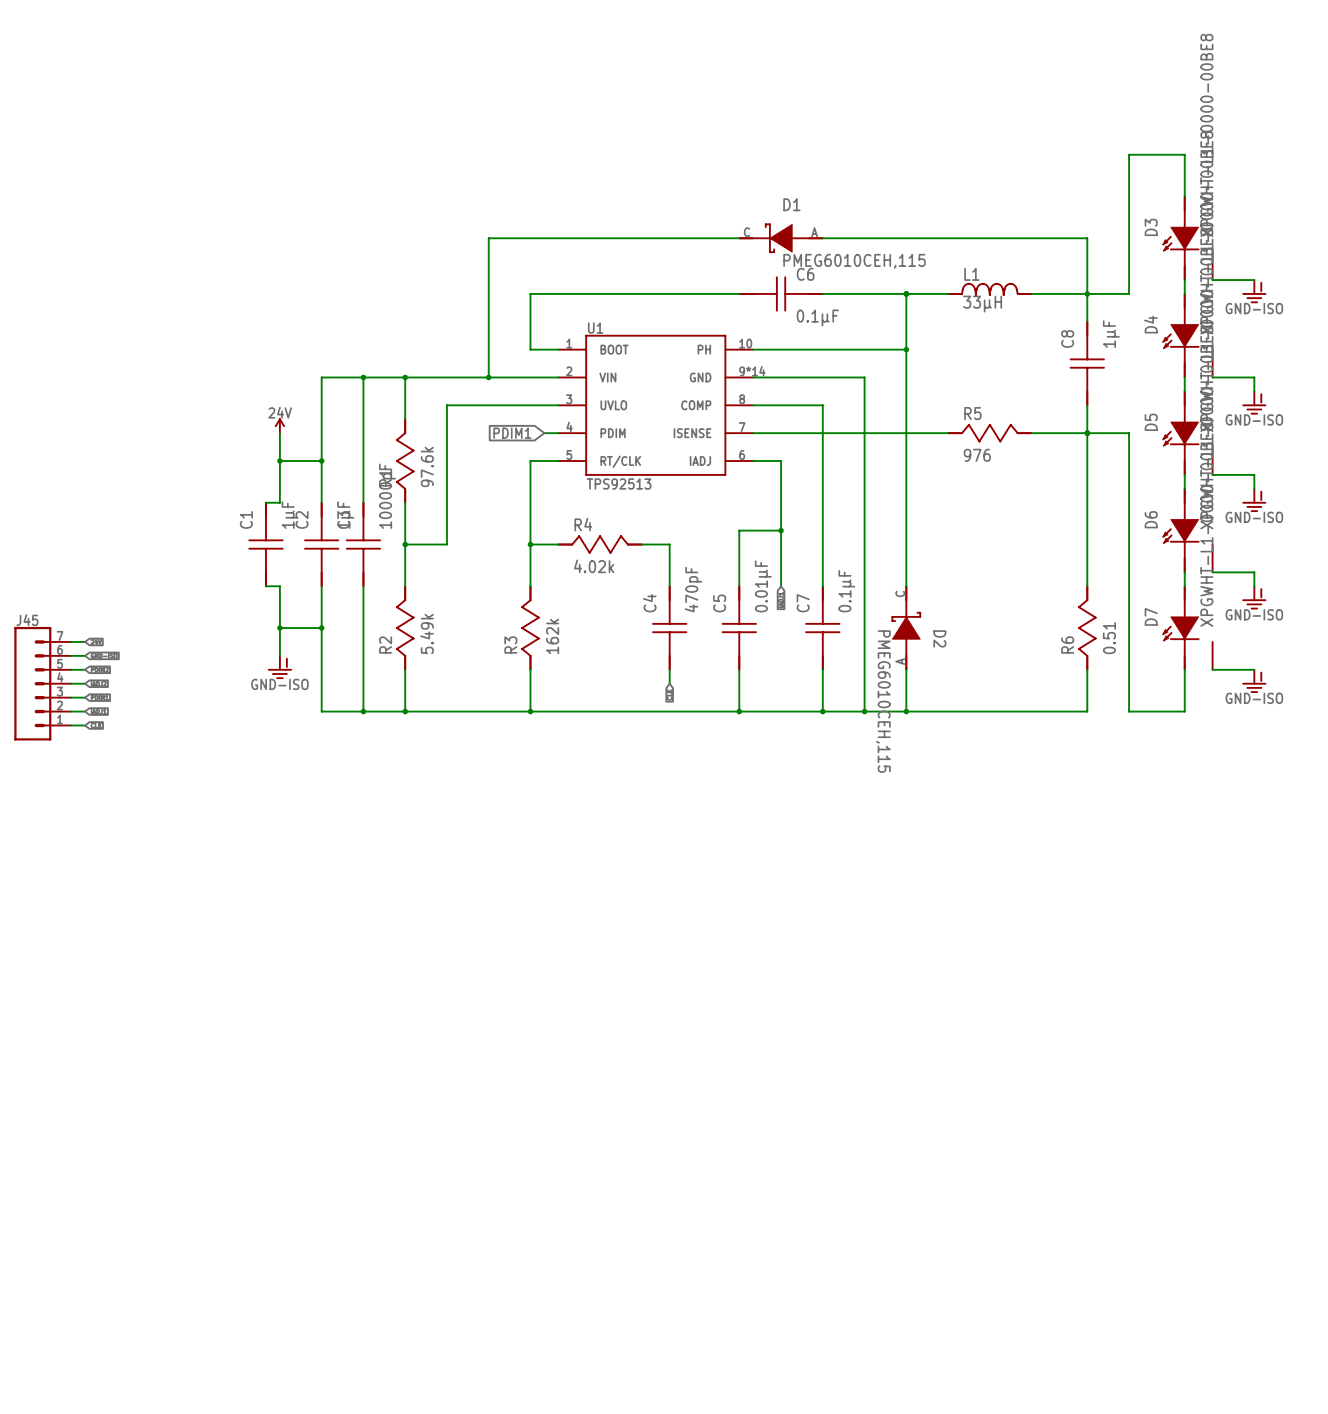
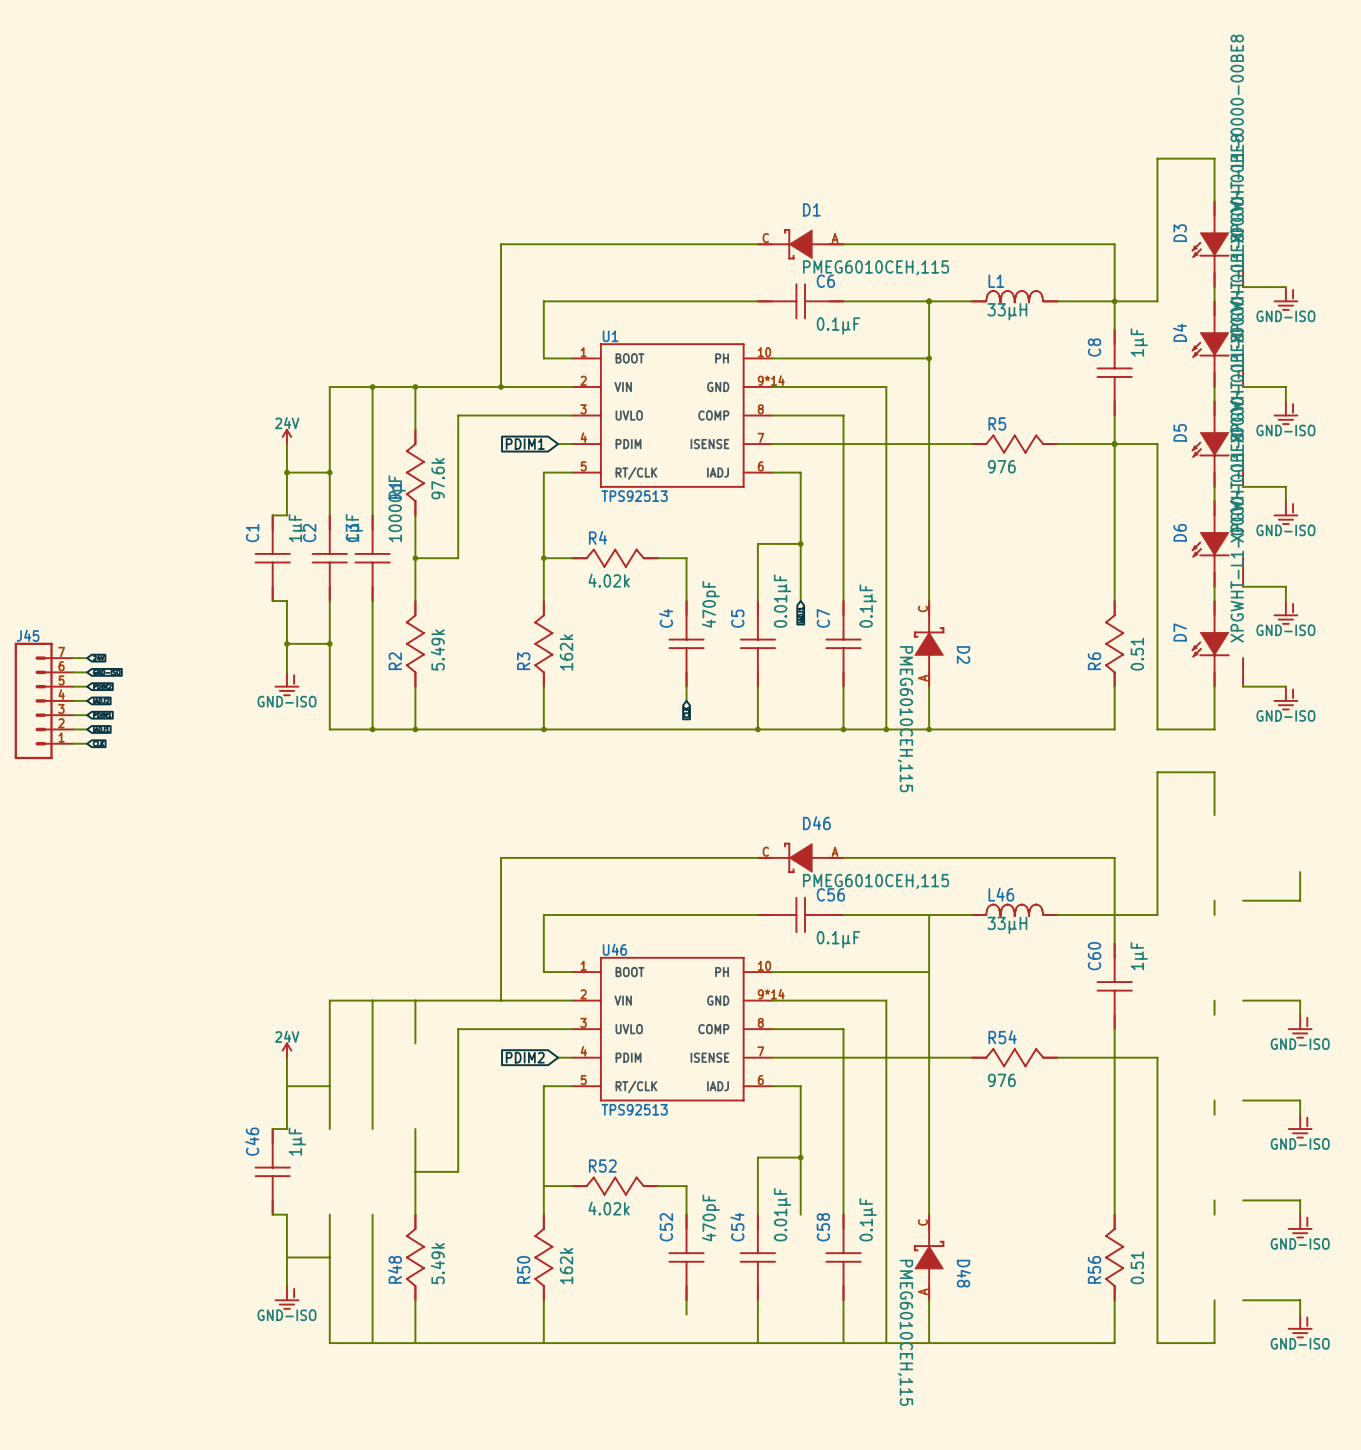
wire: none -> (1214, 815) (1214, 772) (1157, 772) (1157, 914) (1057, 914)
wire: none -> (757, 857) (501, 857) (501, 1000)
D46: none -> PMEG6010CEH,115 (800, 857)
wire: none -> (843, 857) (1114, 857) (1114, 943)
wire: none -> (1300, 872) (1300, 900) (1243, 900)
wire: none -> (1214, 900) (1214, 914)
L46: none -> 33µH (1014, 910)
wire: none -> (757, 914) (543, 914) (543, 972) (572, 972)
C56: none -> 0.1µF (800, 914)
wire: none -> (843, 914) (971, 914)
wire: none -> (929, 914) (929, 1214)
wire: none -> (772, 972) (929, 972)
C60: none -> 1µF (1114, 986)
wire: none -> (372, 1000) (372, 1129)
wire: none -> (415, 1000) (415, 1043)
wire: none -> (572, 1000) (329, 1000) (329, 1129)
wire: none -> (772, 1000) (886, 1000) (886, 1343)
wire: none -> (1214, 1000) (1214, 1014)
wire: none -> (1243, 1000) (1300, 1000) (1300, 1014)
power symbol: none -> GND-ISO (1300, 1026)
wire: none -> (572, 1029) (458, 1029) (458, 1171) (415, 1171)
U46: none -> TPS92513 (672, 1029)
wire: none -> (772, 1029) (843, 1029) (843, 1214)
wire: none -> (1114, 1029) (1114, 1214)
power symbol: none -> 24V (286, 1050)
wire: none -> (286, 1057) (286, 1129) (272, 1129)
global label: none -> PDIM2 (525, 1057)
wire: none -> (558, 1057) (572, 1057)
wire: none -> (772, 1057) (971, 1057)
R54: none -> 976 (1014, 1057)
wire: none -> (1057, 1057) (1157, 1057) (1157, 1343) (1214, 1343) (1214, 1300)
wire: none -> (286, 1086) (329, 1086)
wire: none -> (572, 1086) (543, 1086) (543, 1214)
wire: none -> (772, 1086) (800, 1086) (800, 1214)
wire: none -> (1214, 1100) (1214, 1114)
wire: none -> (1243, 1100) (1300, 1100) (1300, 1114)
power symbol: none -> GND-ISO (1300, 1126)
wire: none -> (415, 1129) (415, 1214)
wire: none -> (800, 1157) (757, 1157) (757, 1214)
junction: none -> (800, 1157)
C46: none -> 1µF (272, 1171)
wire: none -> (543, 1186) (572, 1186)
R52: none -> 4.02k (615, 1186)
wire: none -> (657, 1186) (686, 1186) (686, 1214)
wire: none -> (1214, 1200) (1214, 1214)
wire: none -> (1243, 1200) (1300, 1200) (1300, 1214)
wire: none -> (272, 1214) (286, 1214) (286, 1286)
wire: none -> (329, 1214) (329, 1343) (1114, 1343) (1114, 1300)
wire: none -> (372, 1214) (372, 1343)
power symbol: none -> GND-ISO (1300, 1226)
wire: none -> (286, 1257) (329, 1257)
R48: none -> 5.49k (415, 1257)
R50: none -> 162k (543, 1257)
C52: none -> 470pF (686, 1257)
C54: none -> 0.01μF (757, 1257)
C58: none -> 0.1µF (843, 1257)
D48: none -> PMEG6010CEH,115 (929, 1257)
R56: none -> 0.51 (1114, 1257)
power symbol: none -> GND-ISO (286, 1297)
wire: none -> (415, 1300) (415, 1343)
wire: none -> (543, 1300) (543, 1343)
wire: none -> (686, 1300) (686, 1314)
wire: none -> (757, 1300) (757, 1343)
wire: none -> (843, 1300) (843, 1343)
wire: none -> (929, 1300) (929, 1343)
wire: none -> (1243, 1300) (1300, 1300) (1300, 1314)
power symbol: none -> GND-ISO (1300, 1326)

